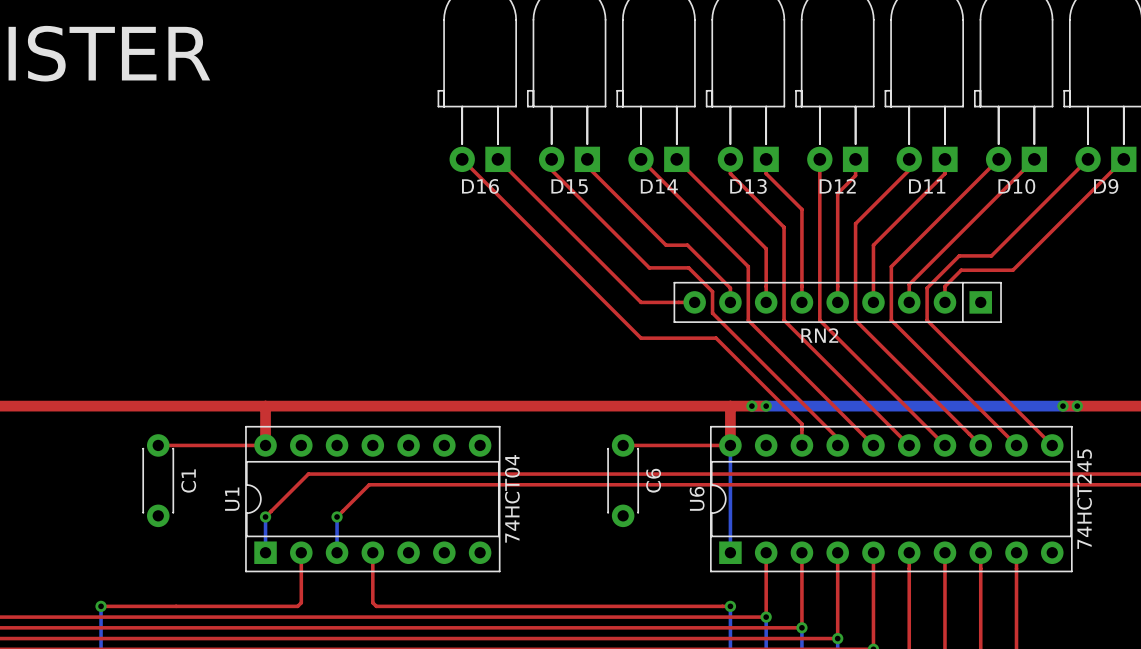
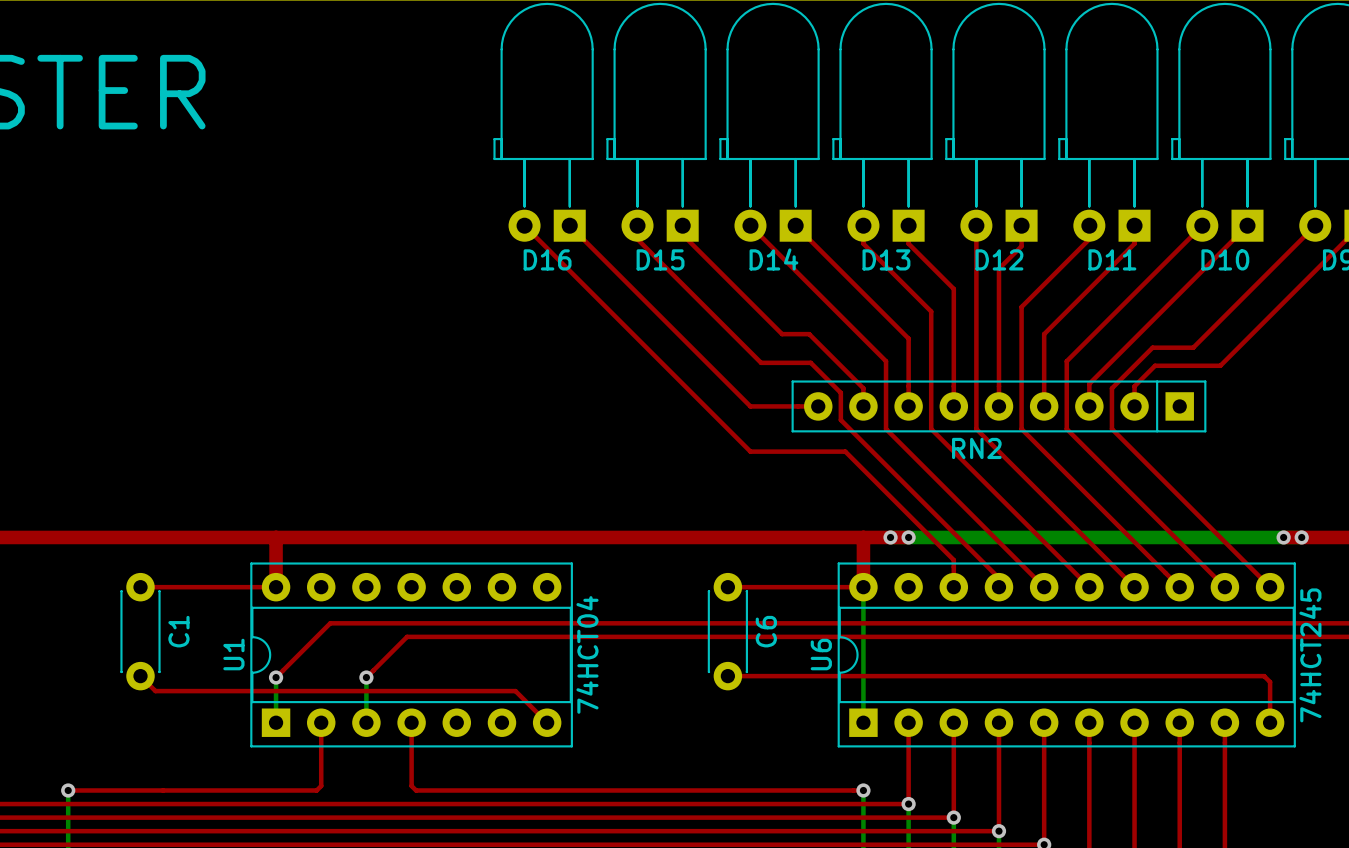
top track: none -> (140, 676) (155, 691) (515, 691) (547, 722)
top track: none -> (727, 676) (1264, 676) (1270, 682) (1270, 722)

